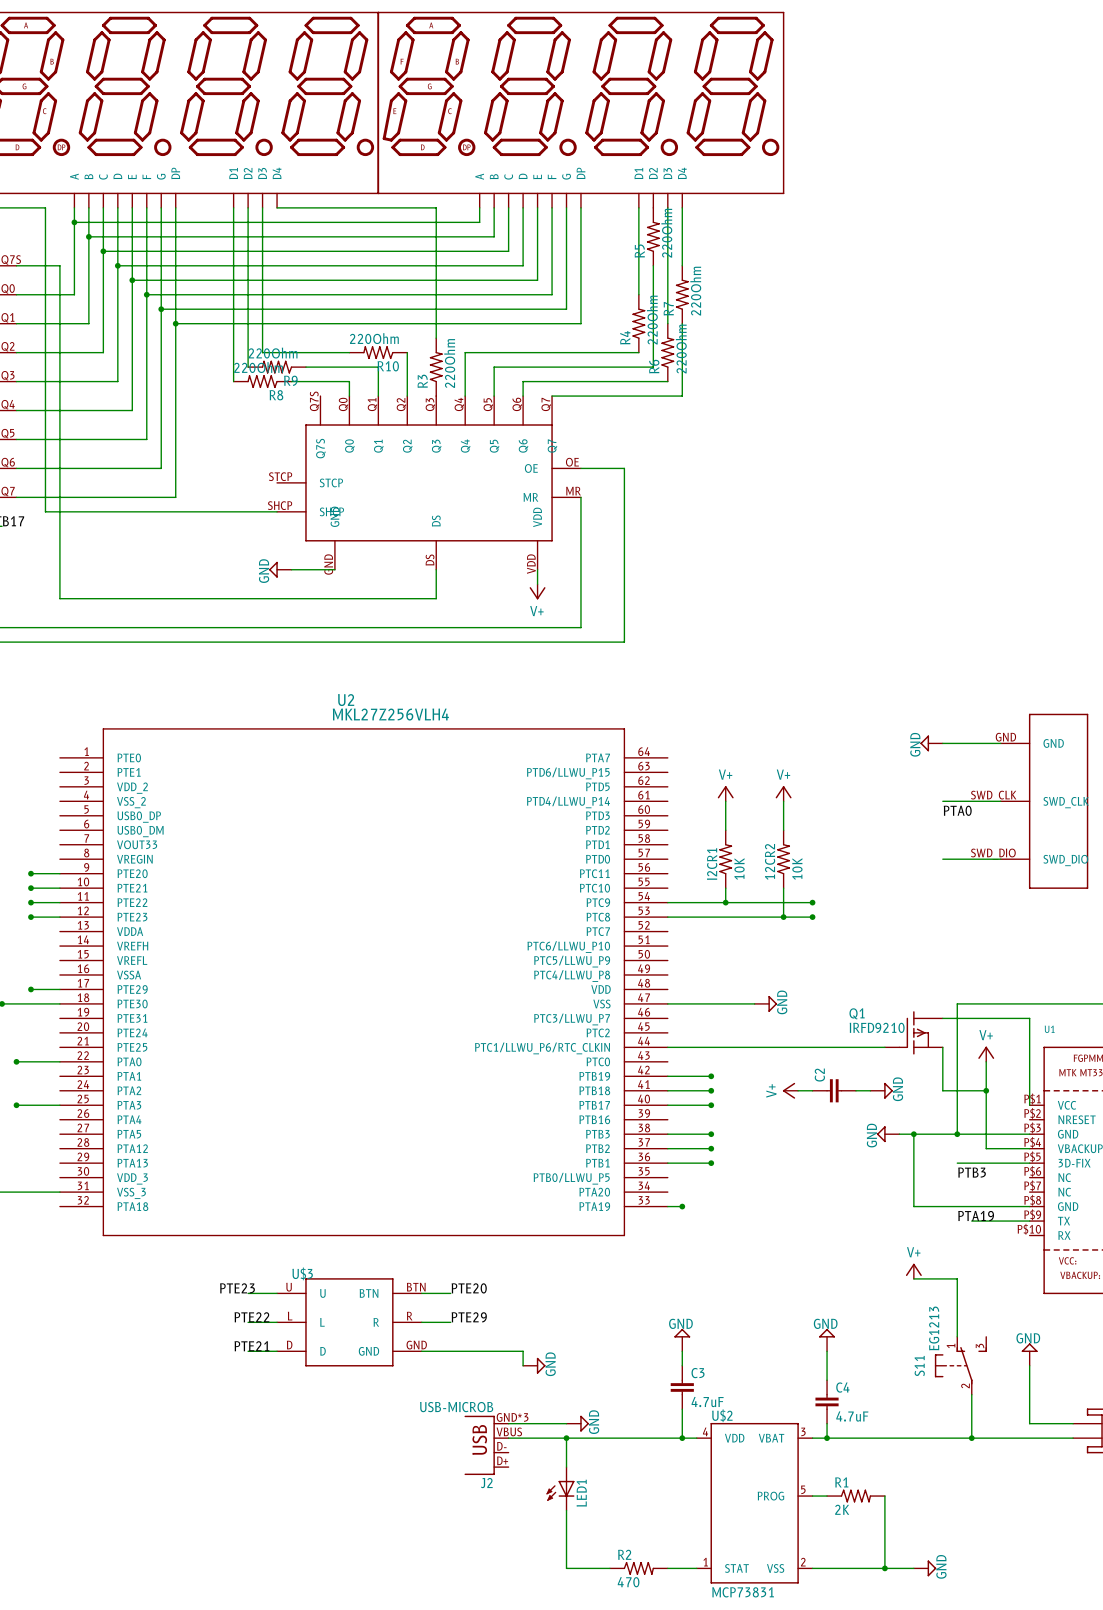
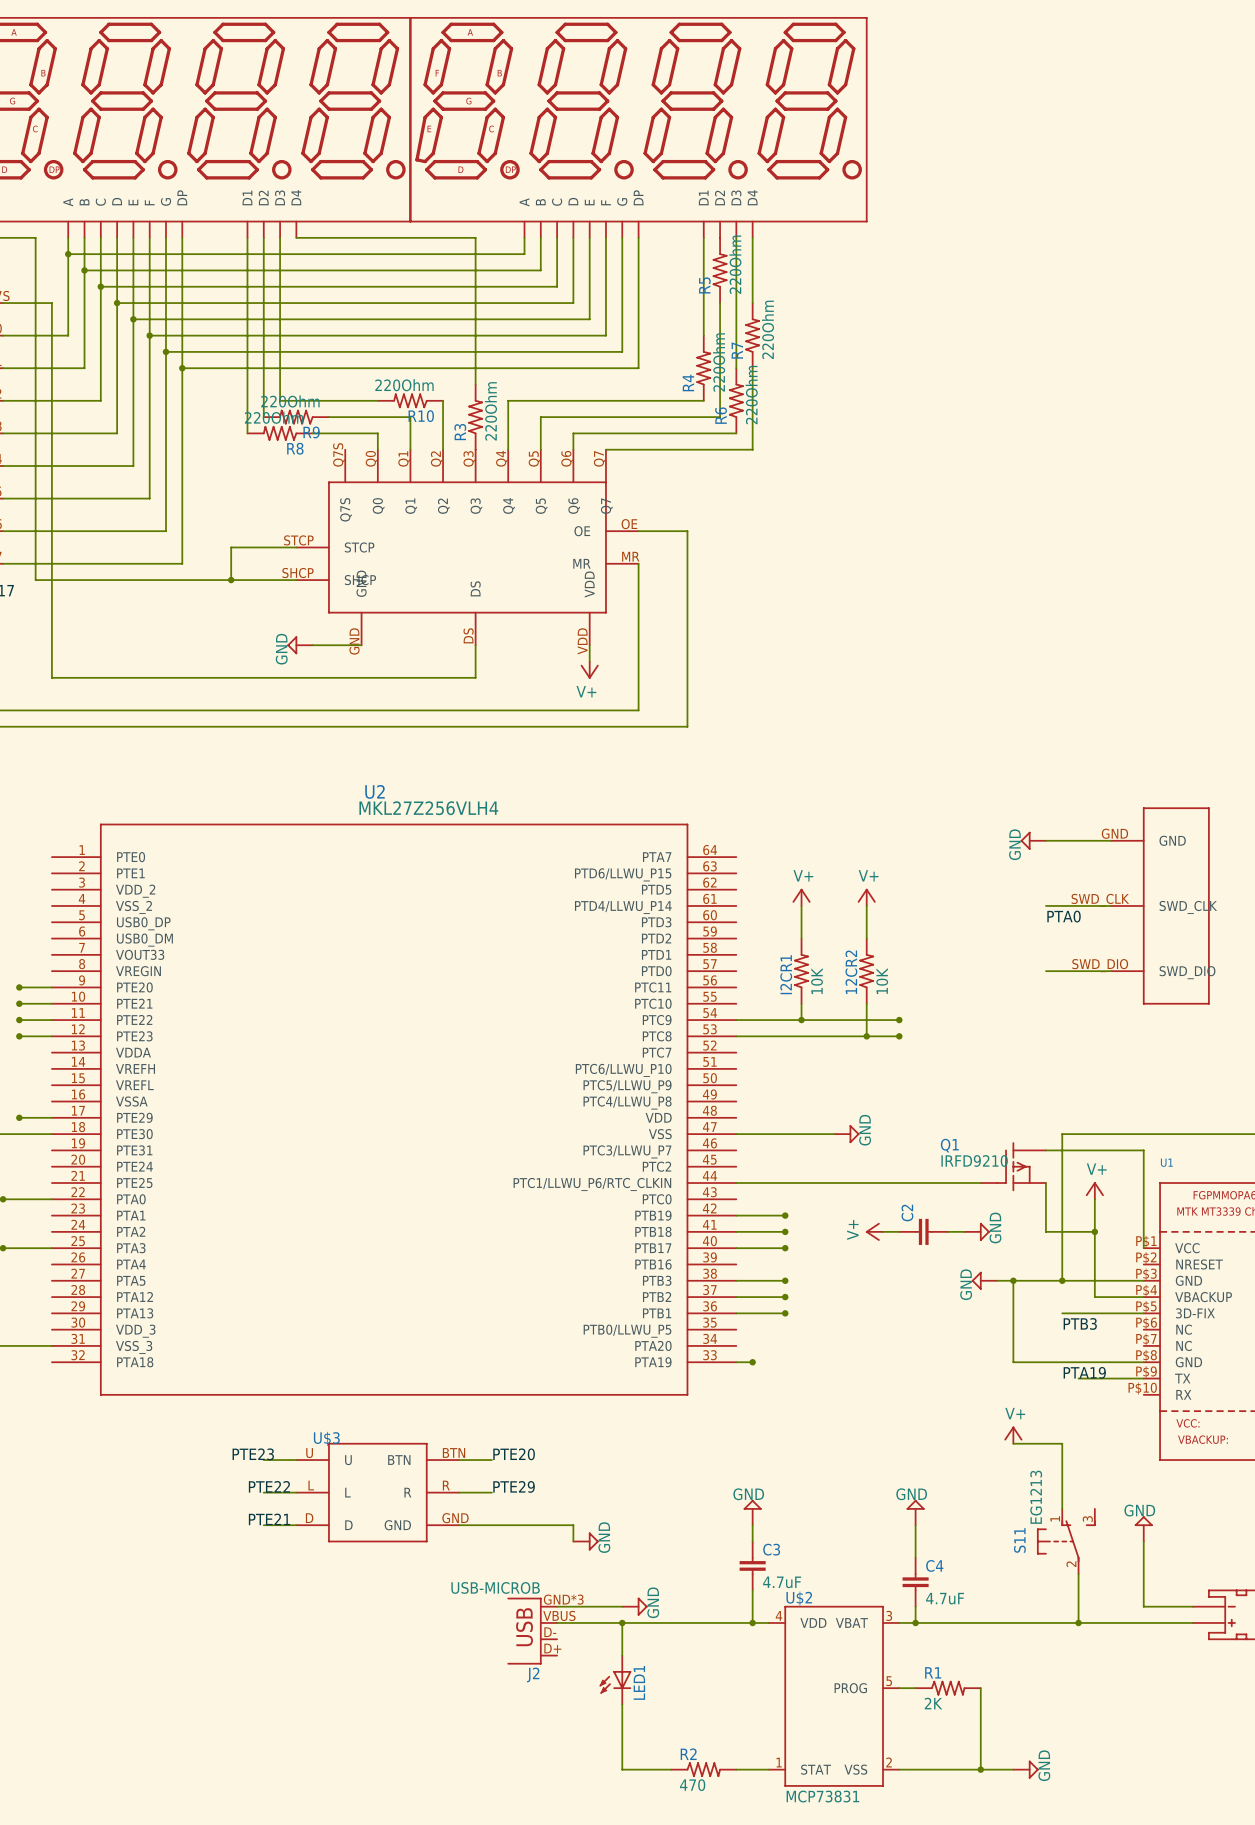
wire: none -> (296, 547) (231, 547) (231, 580)
junction: none -> (231, 580)

